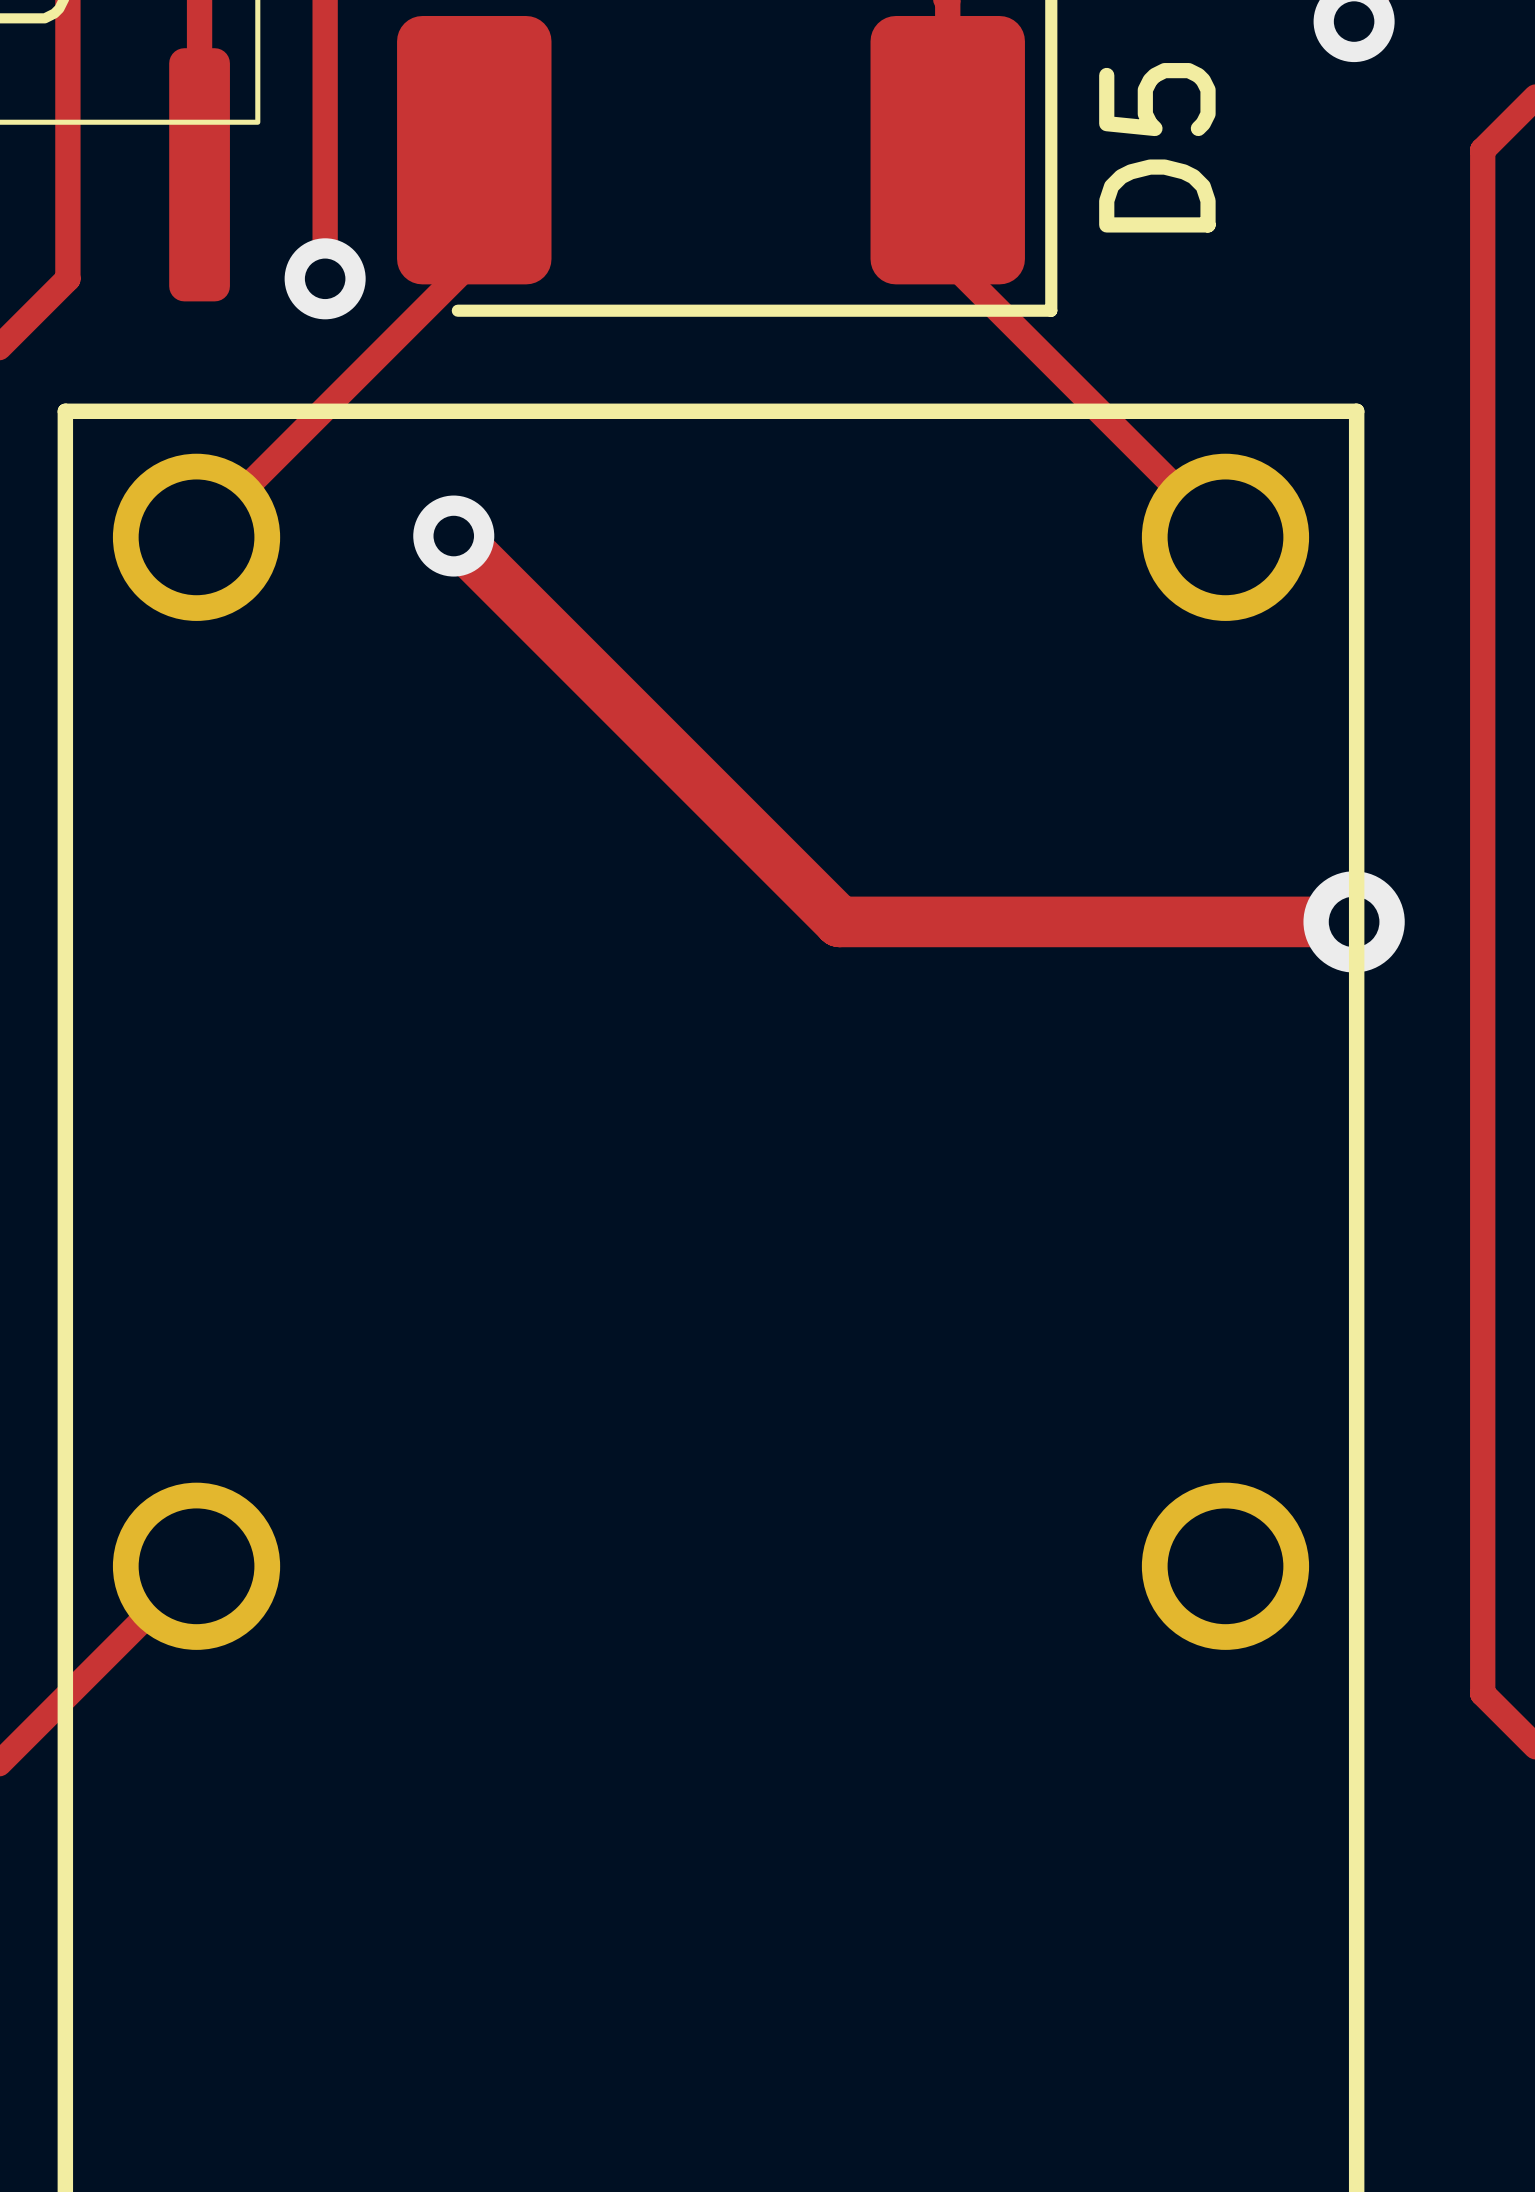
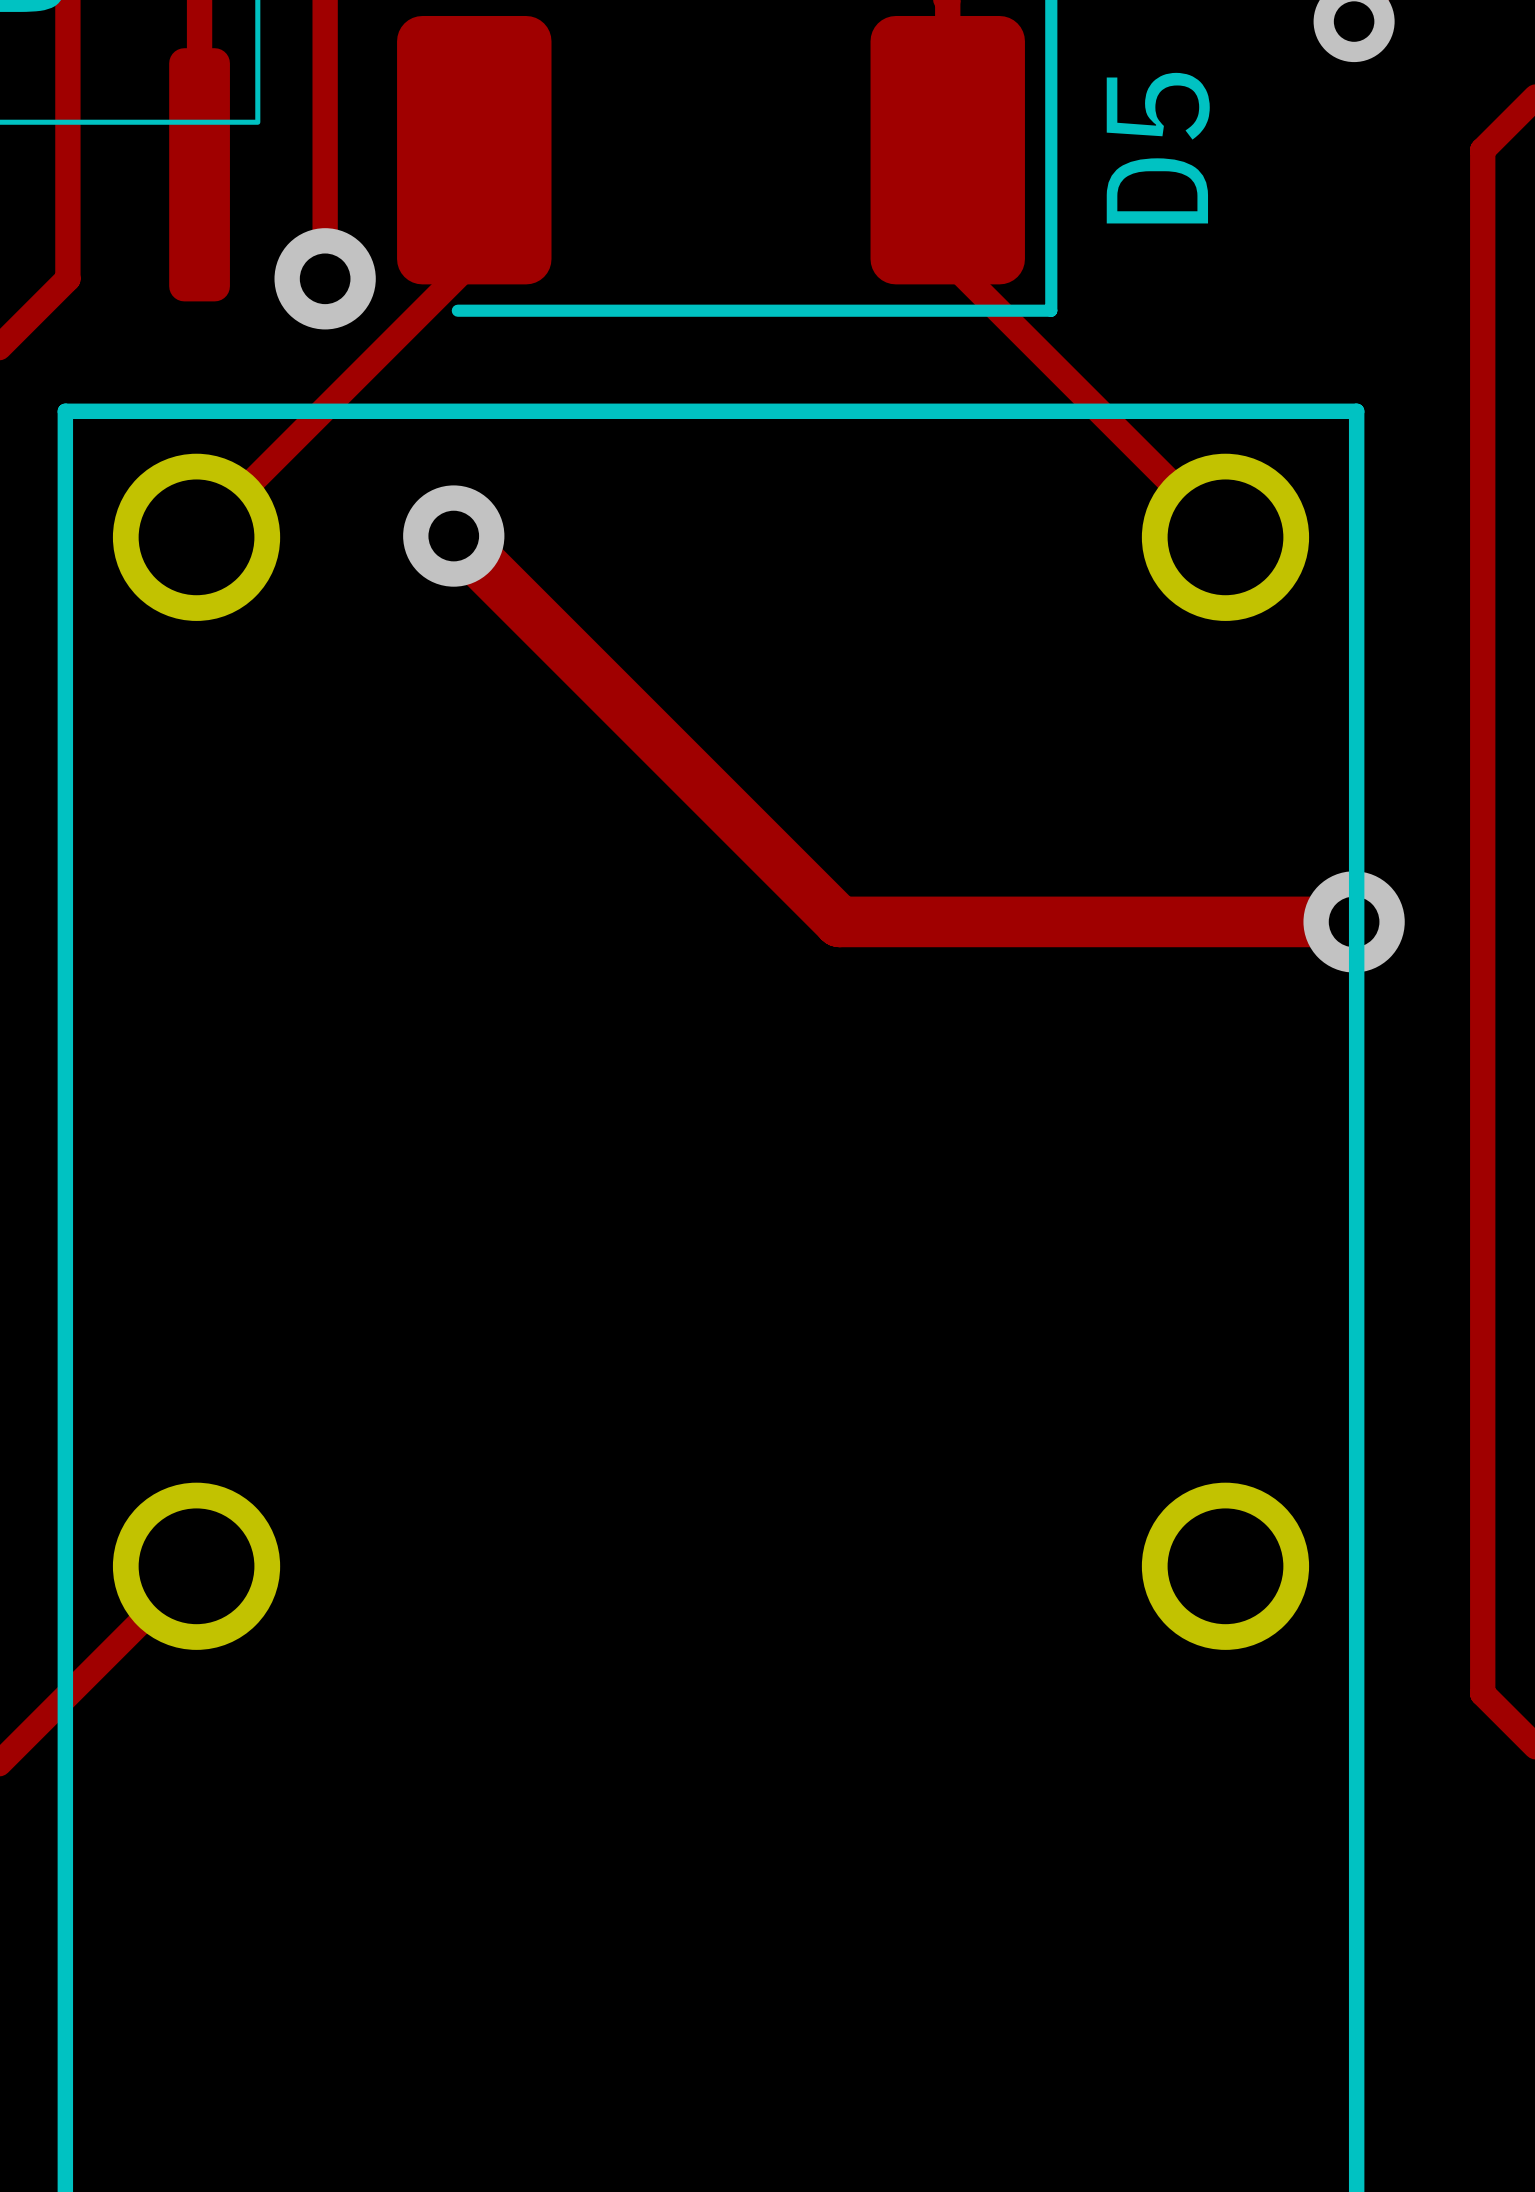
via size: [284, 238, 366, 320] -> [274, 228, 376, 330]
via size: [413, 495, 495, 577] -> [403, 485, 505, 587]

